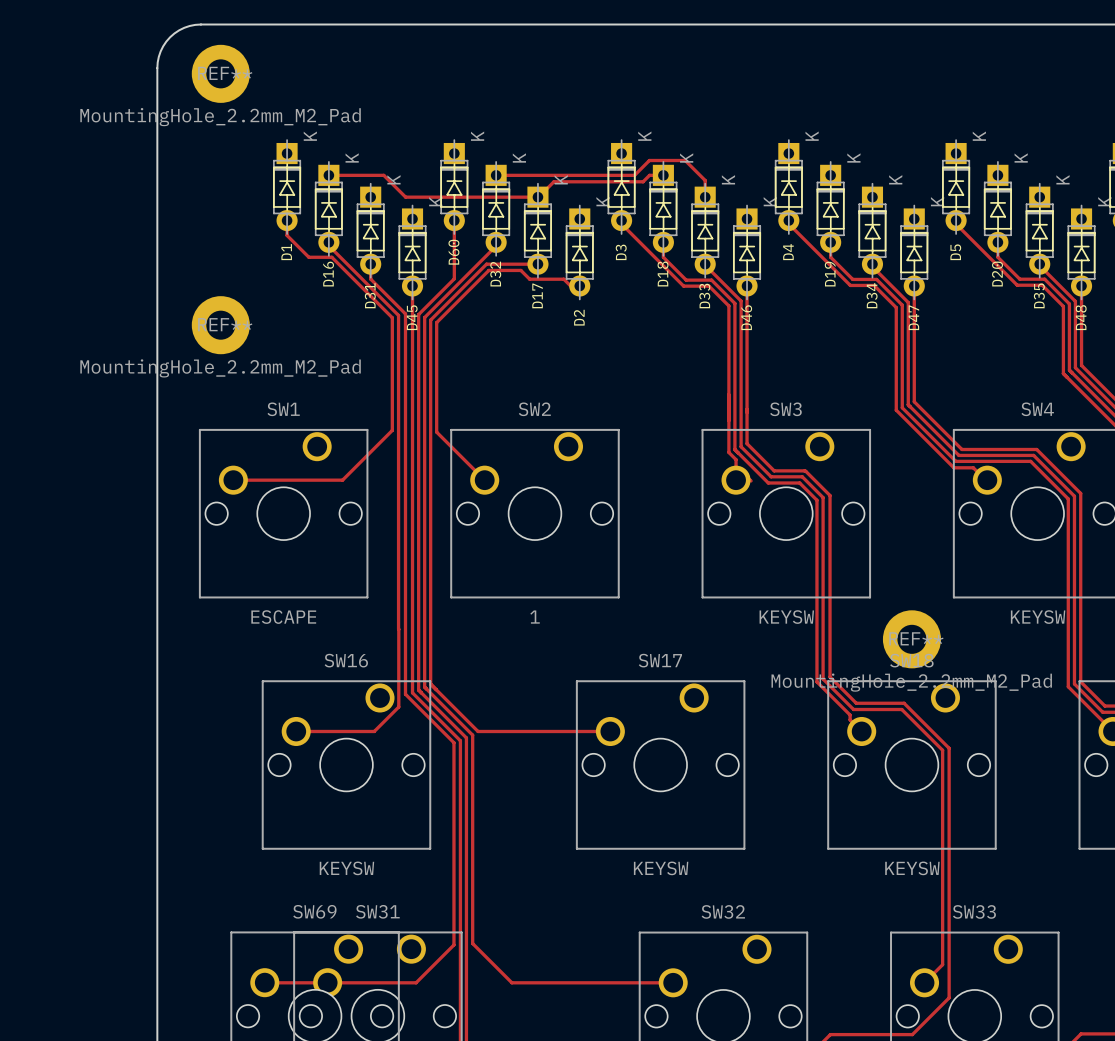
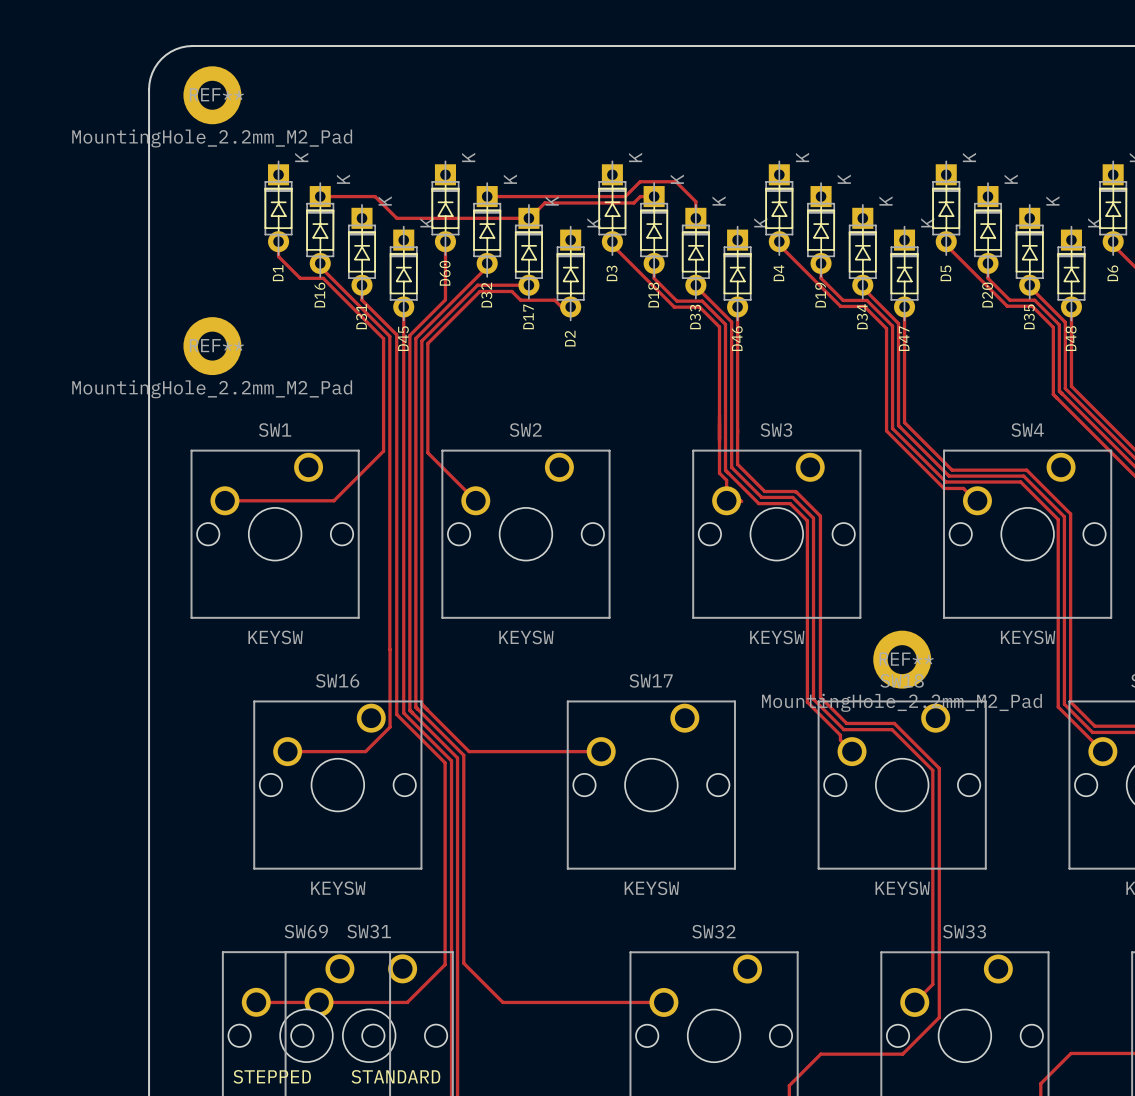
SW1 value: ESCAPE (283, 617) -> KEYSW (275, 637)
SW2 value: 1 (535, 617) -> KEYSW (526, 637)

